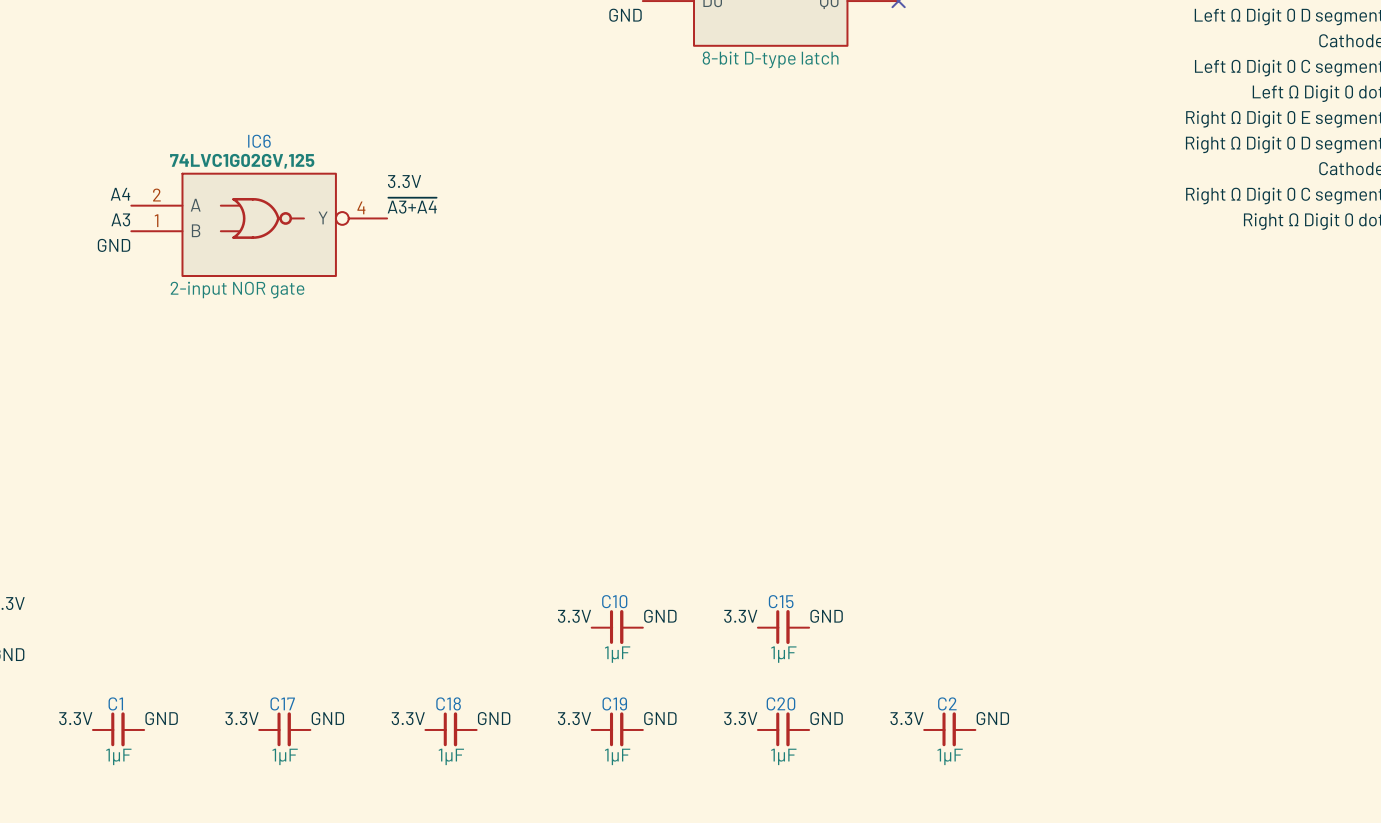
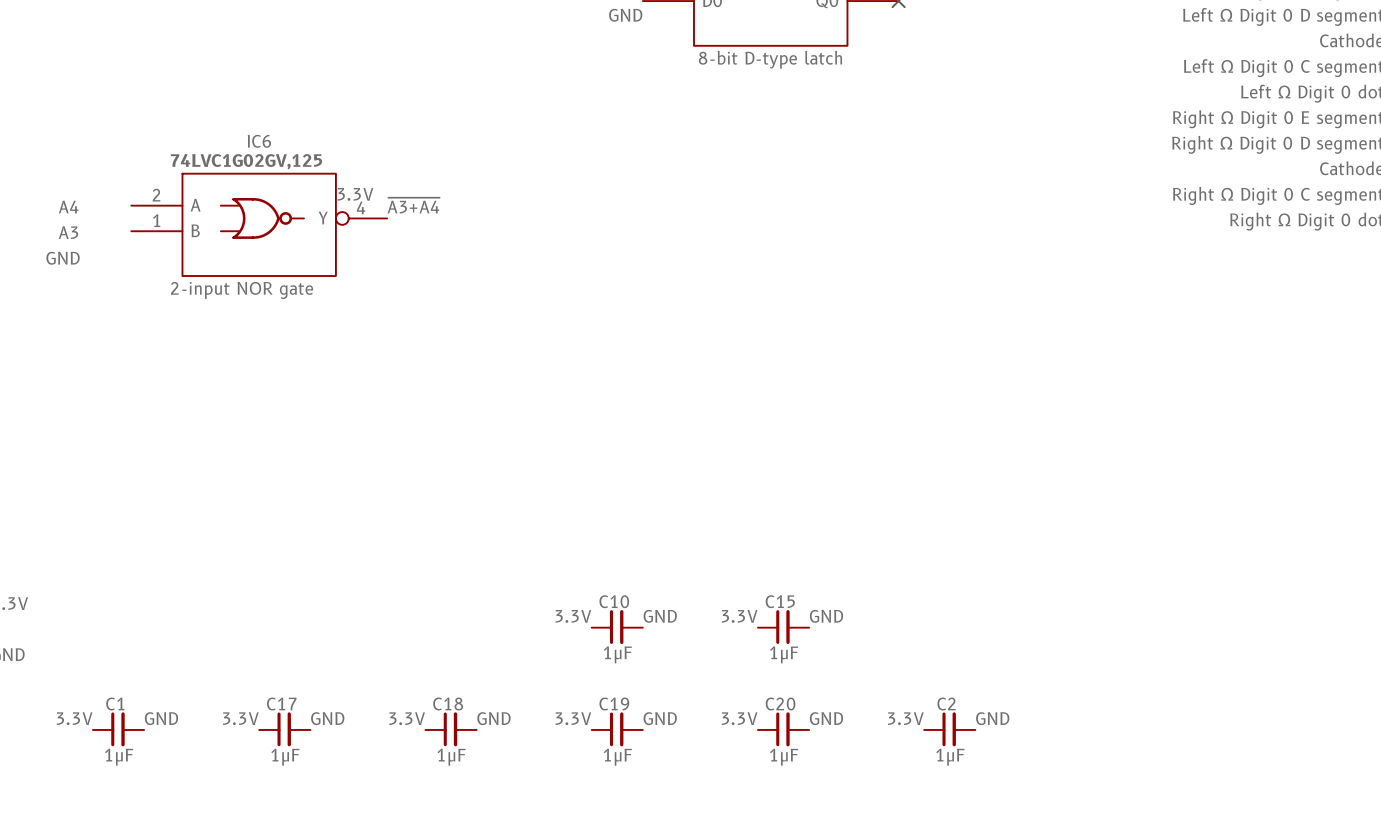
label position: 3.3V (404, 181) -> 3.3V (355, 194)
label position: A4 (120, 194) -> A4 (68, 207)
label position: A3 (120, 219) -> A3 (68, 232)
label position: GND (114, 245) -> GND (63, 258)

